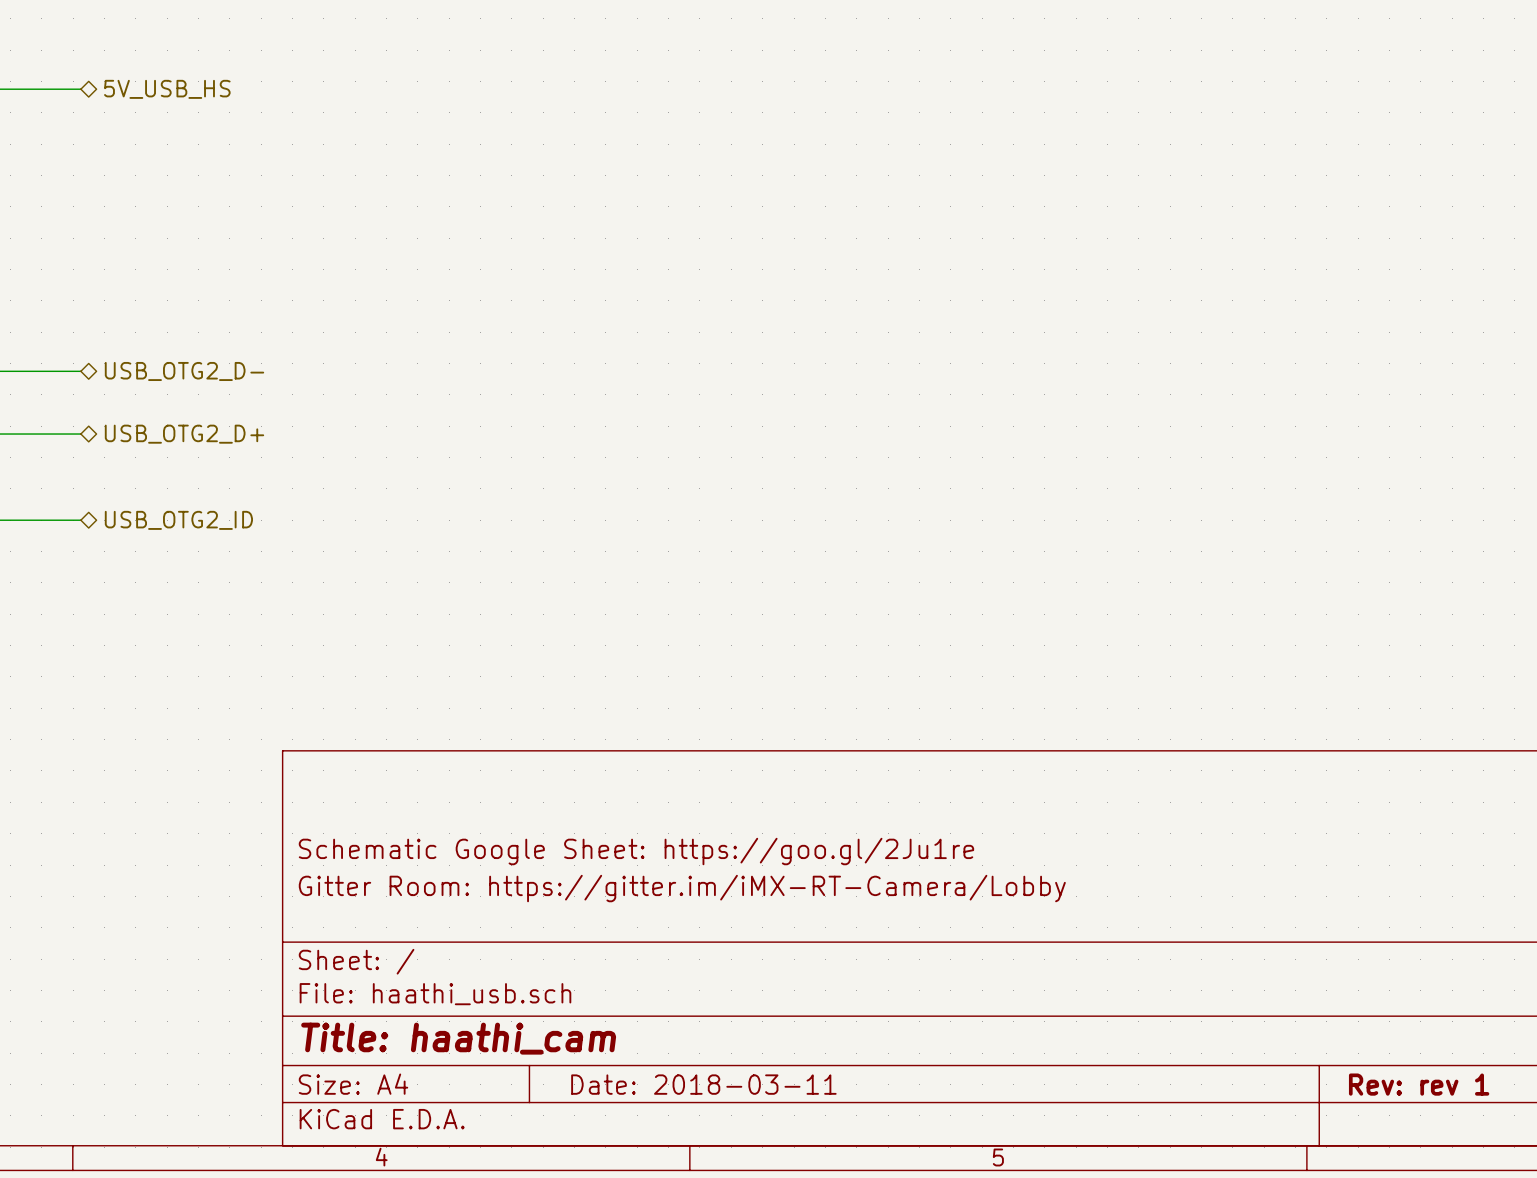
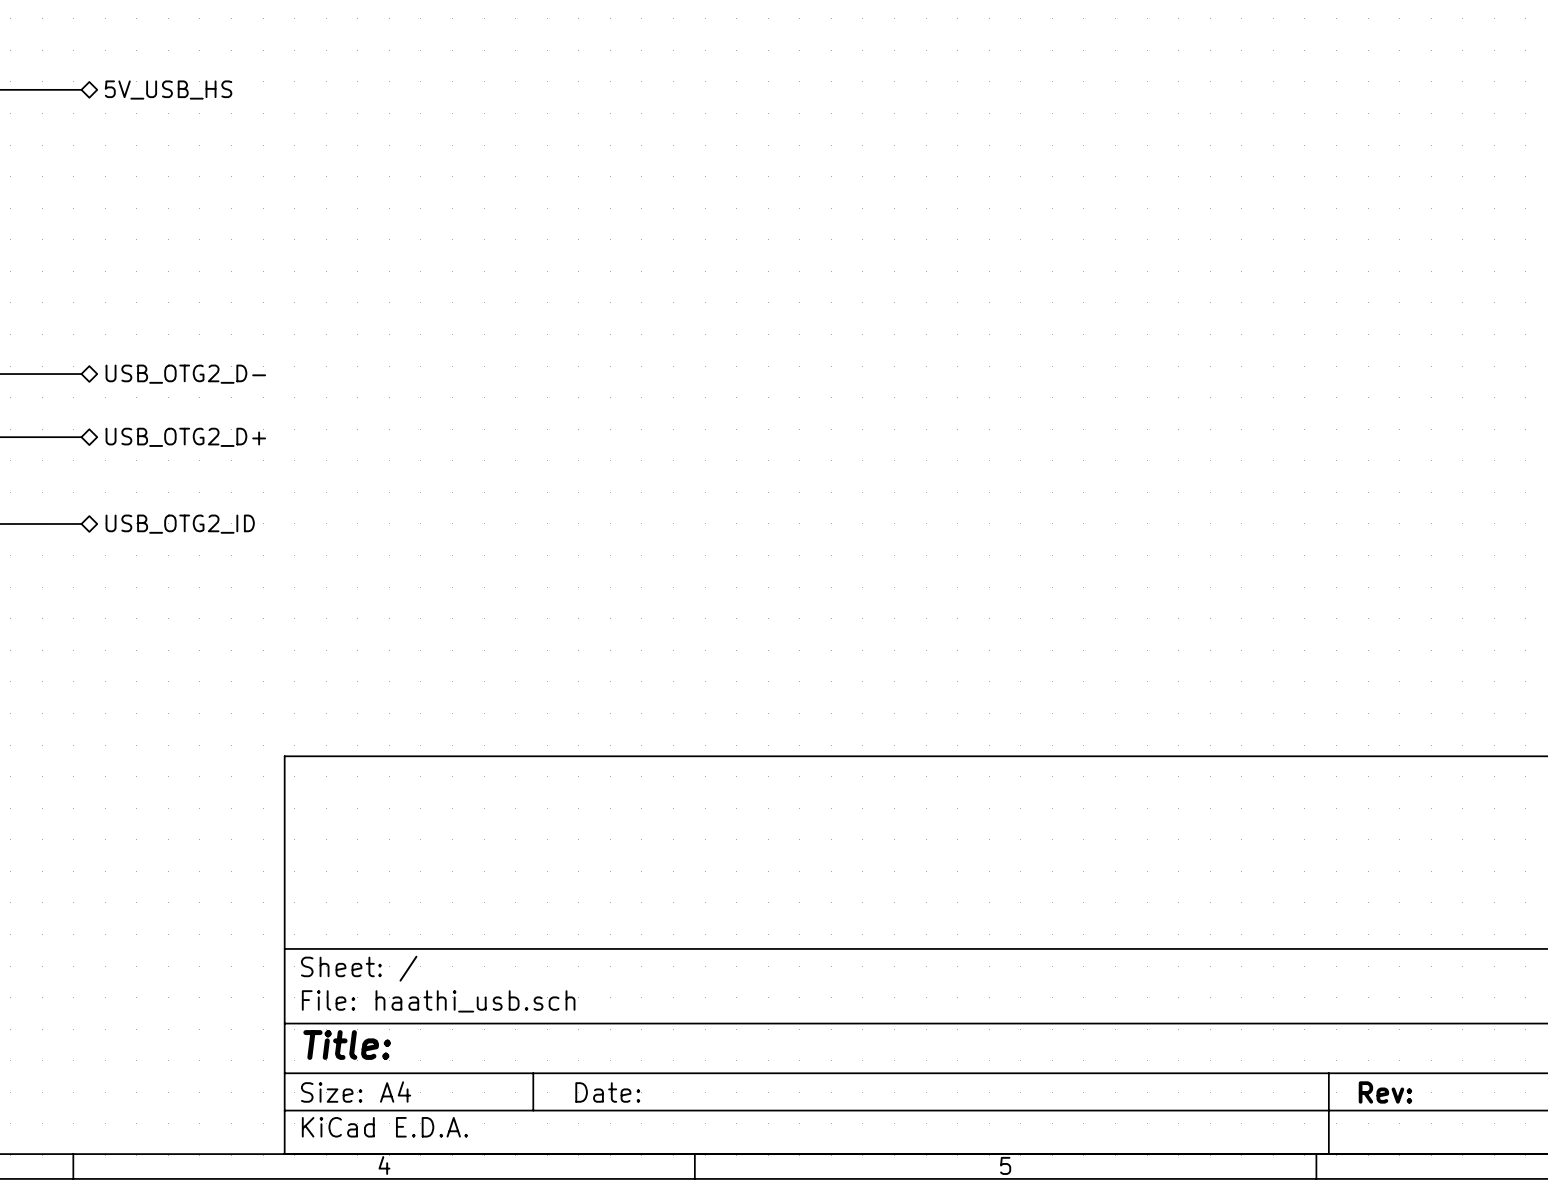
title block: Schematic Google Sheet: https://goo.gl/2Ju1re (636, 851) -> none
title block: Gitter Room: https://gitter.im/iMX-RT-Camera/Lobby (682, 888) -> none
title block: Title: haathi_cam (458, 1038) -> Title: (347, 1045)
title block: Date: 2018-03-11 (703, 1084) -> Date: (607, 1092)
title block: Rev: rev 1 (1419, 1084) -> Rev: (1385, 1092)

